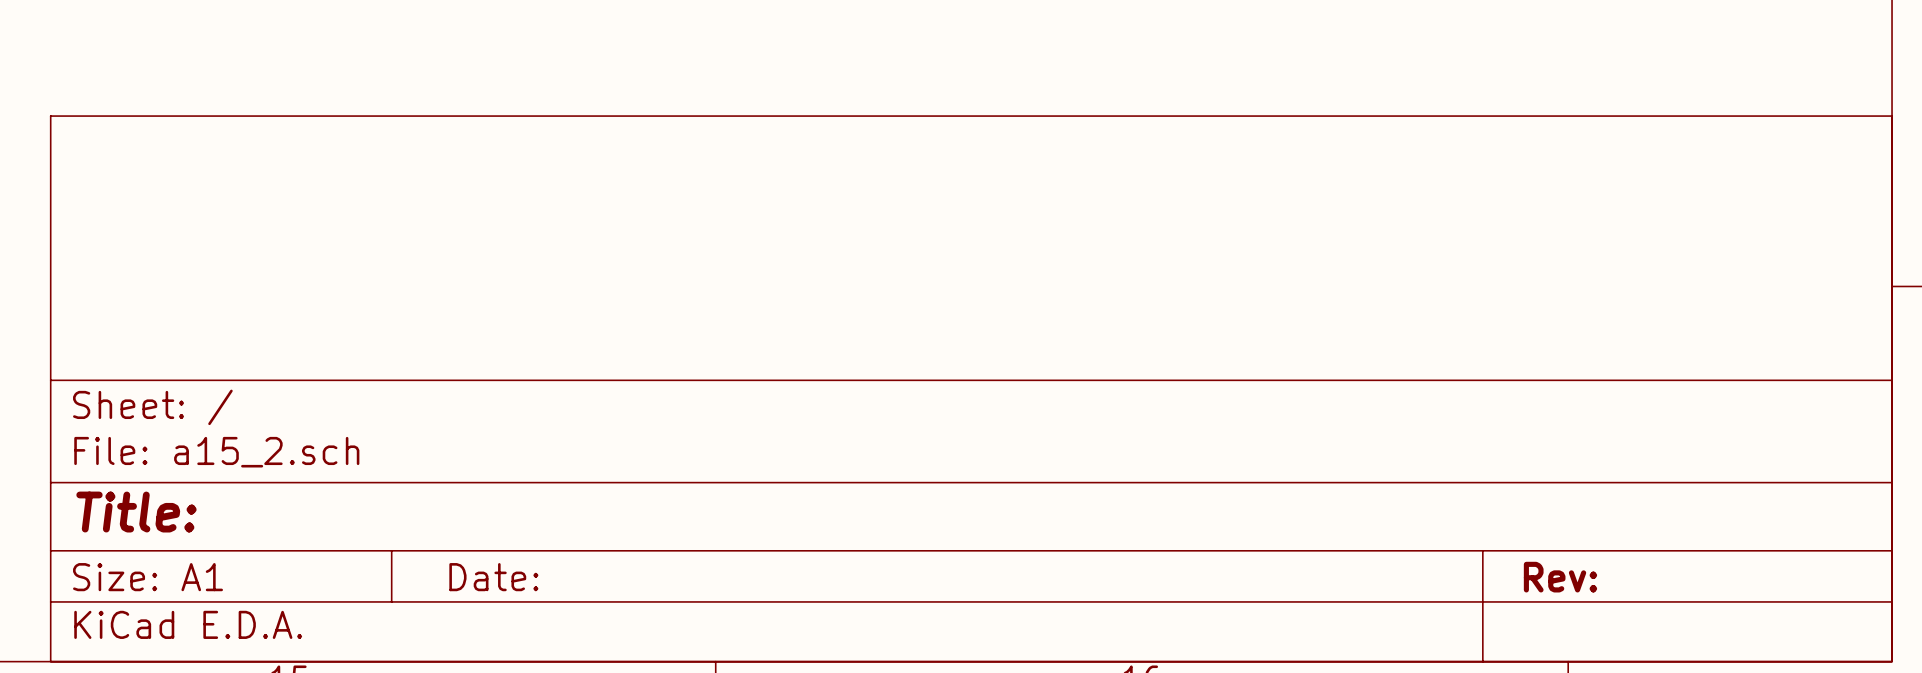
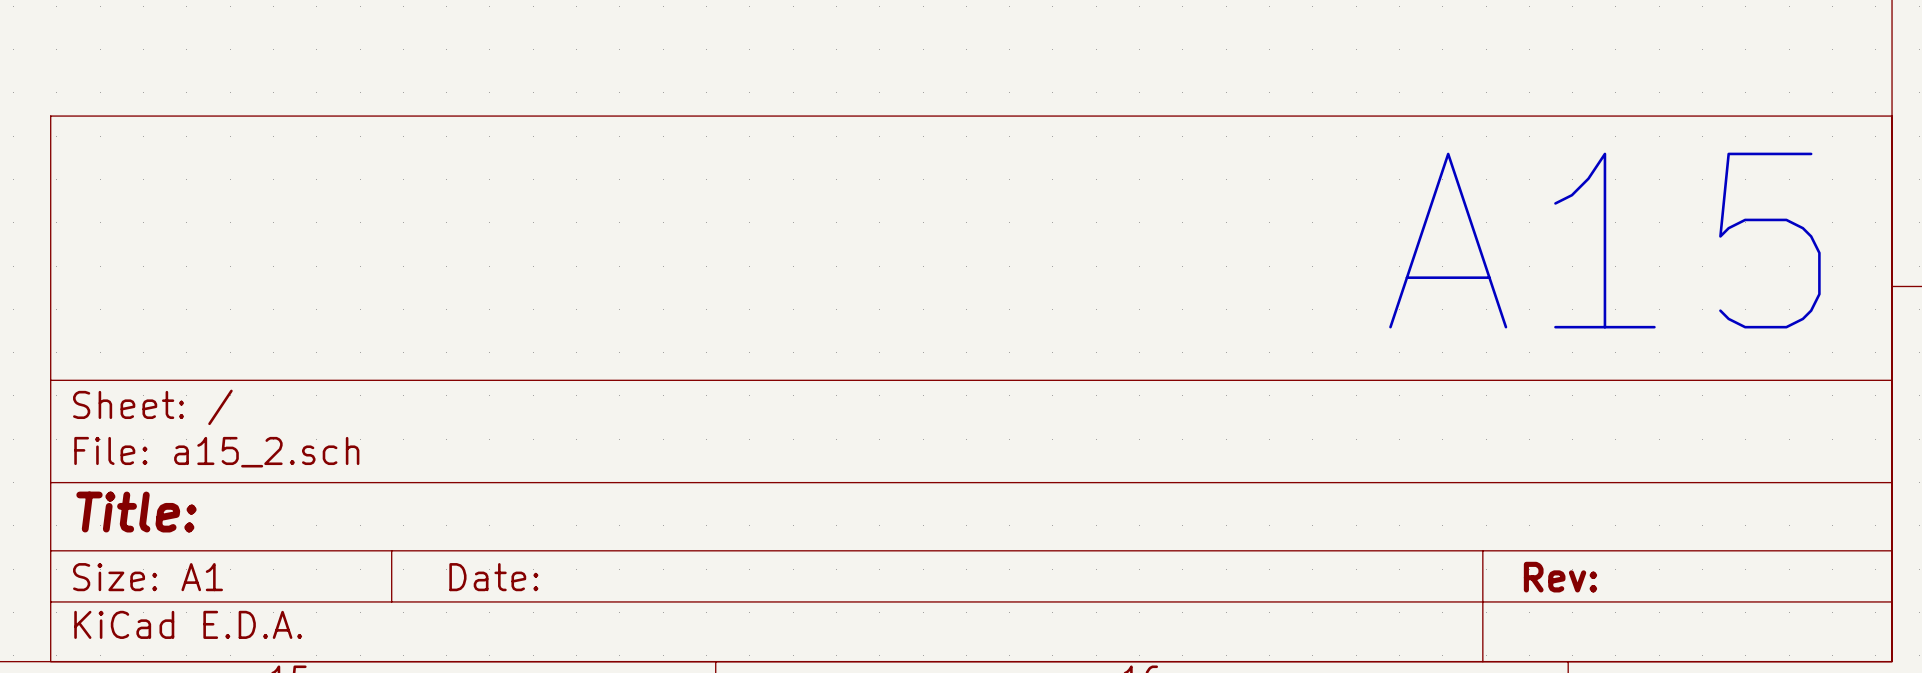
text: none -> A15 (1604, 240)

